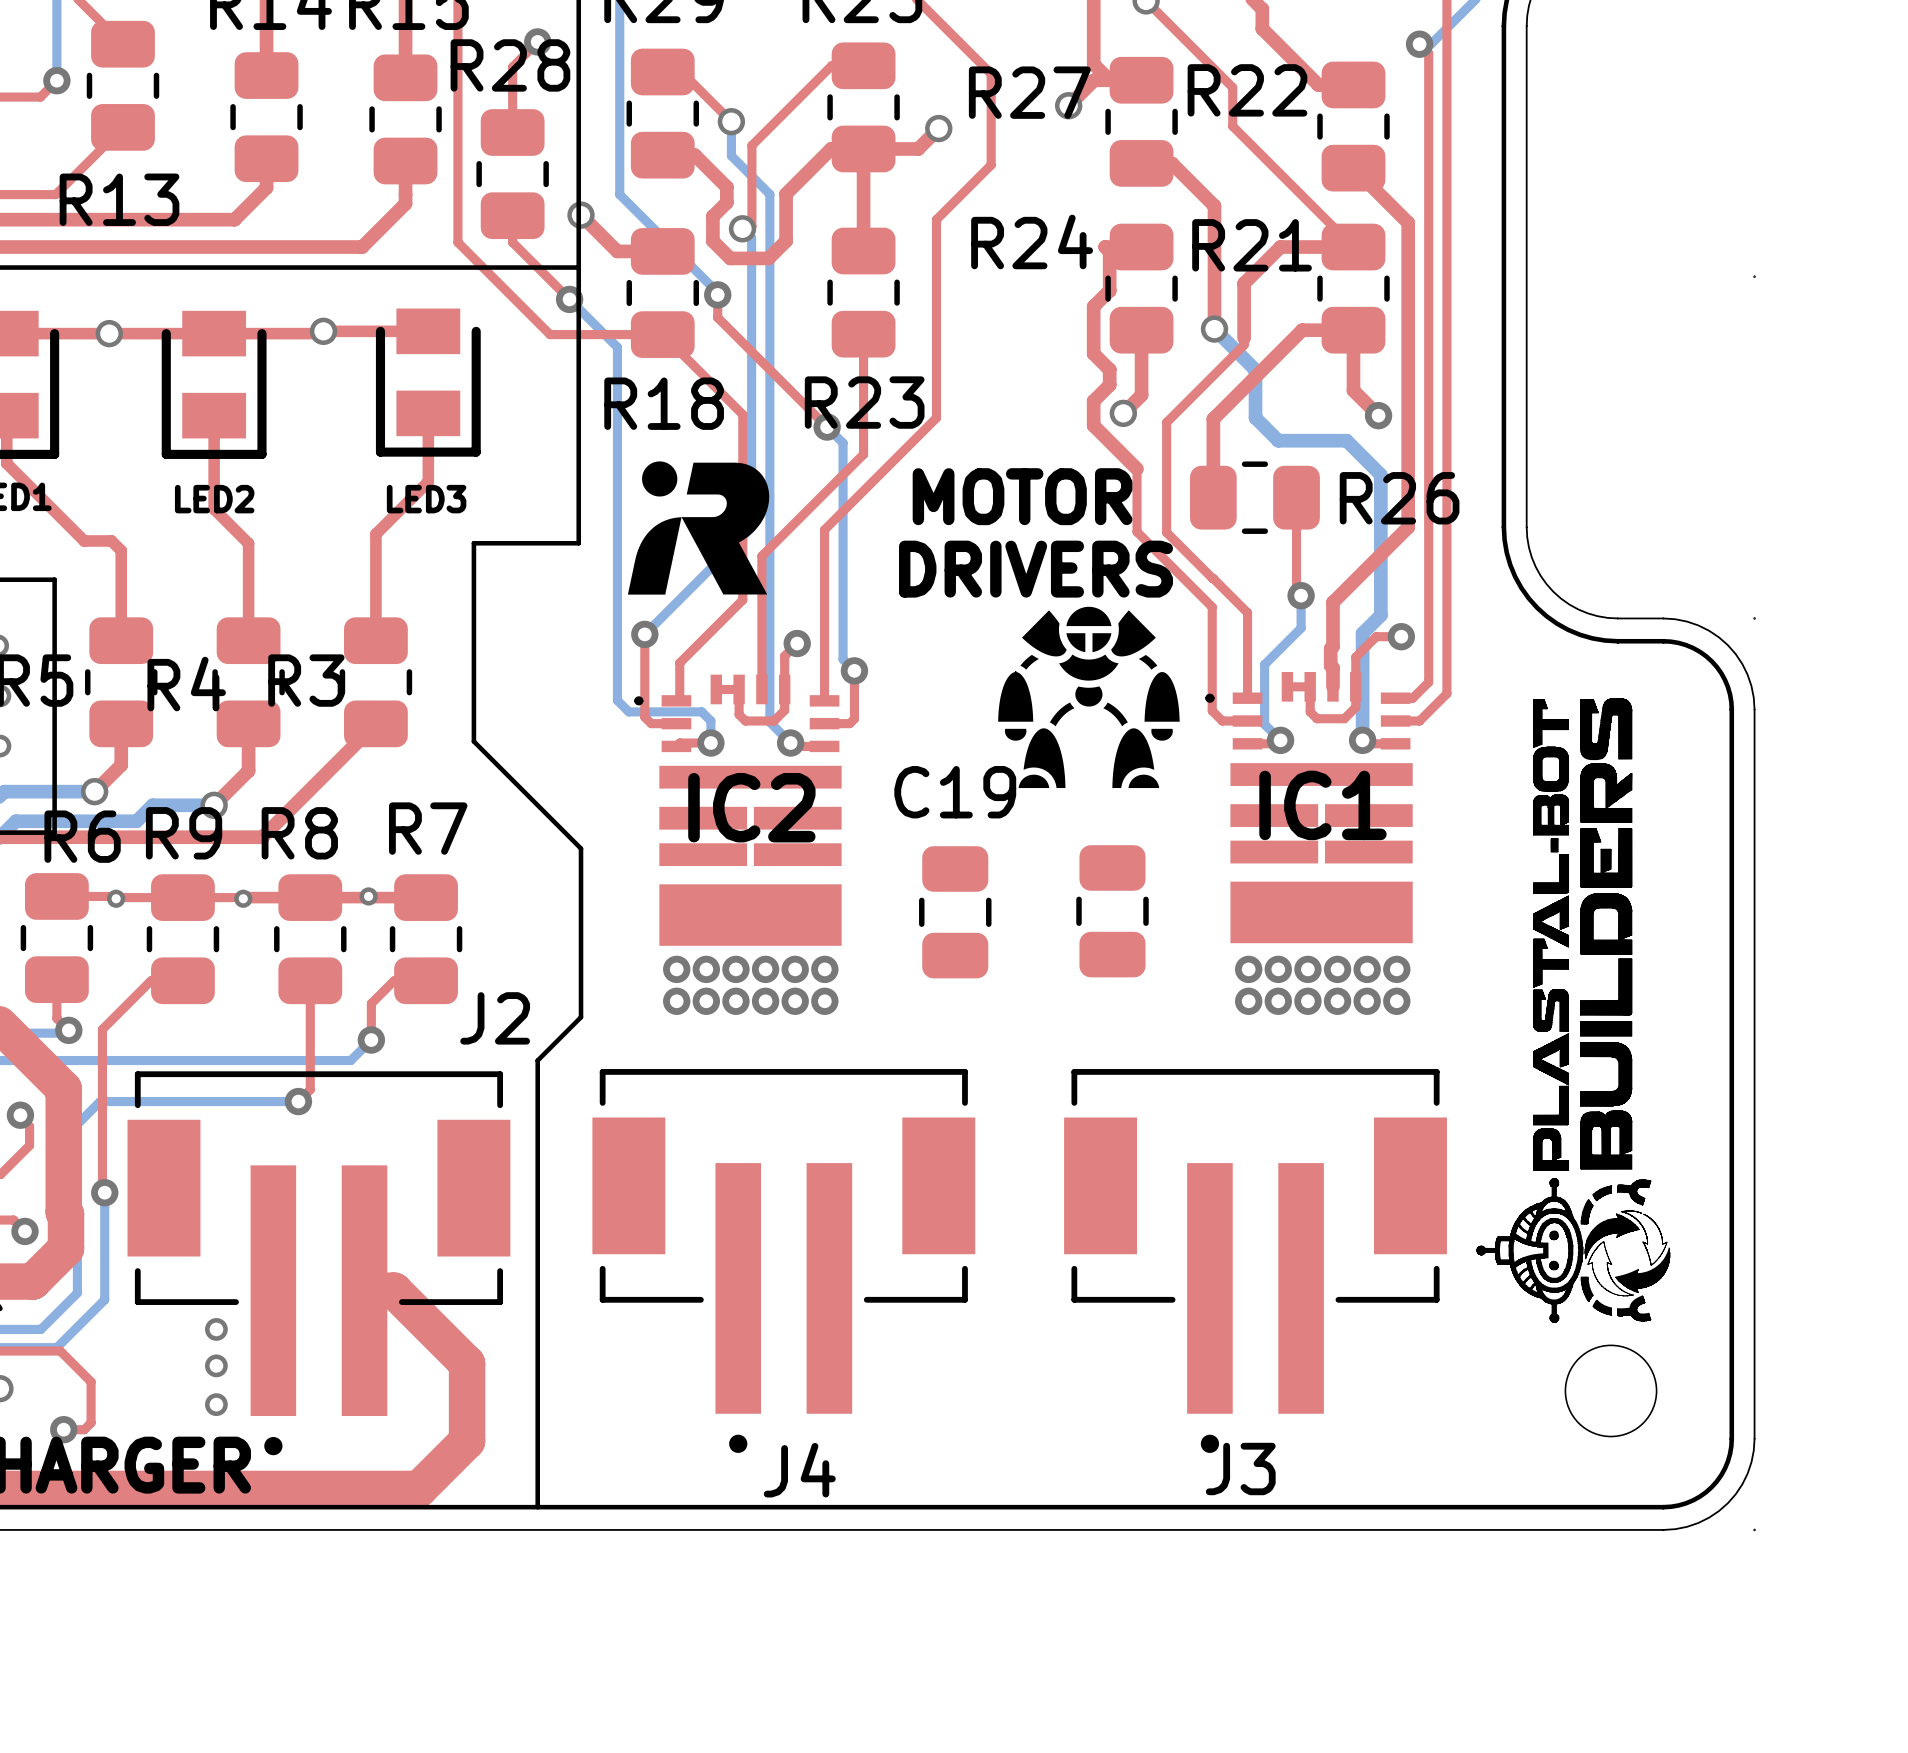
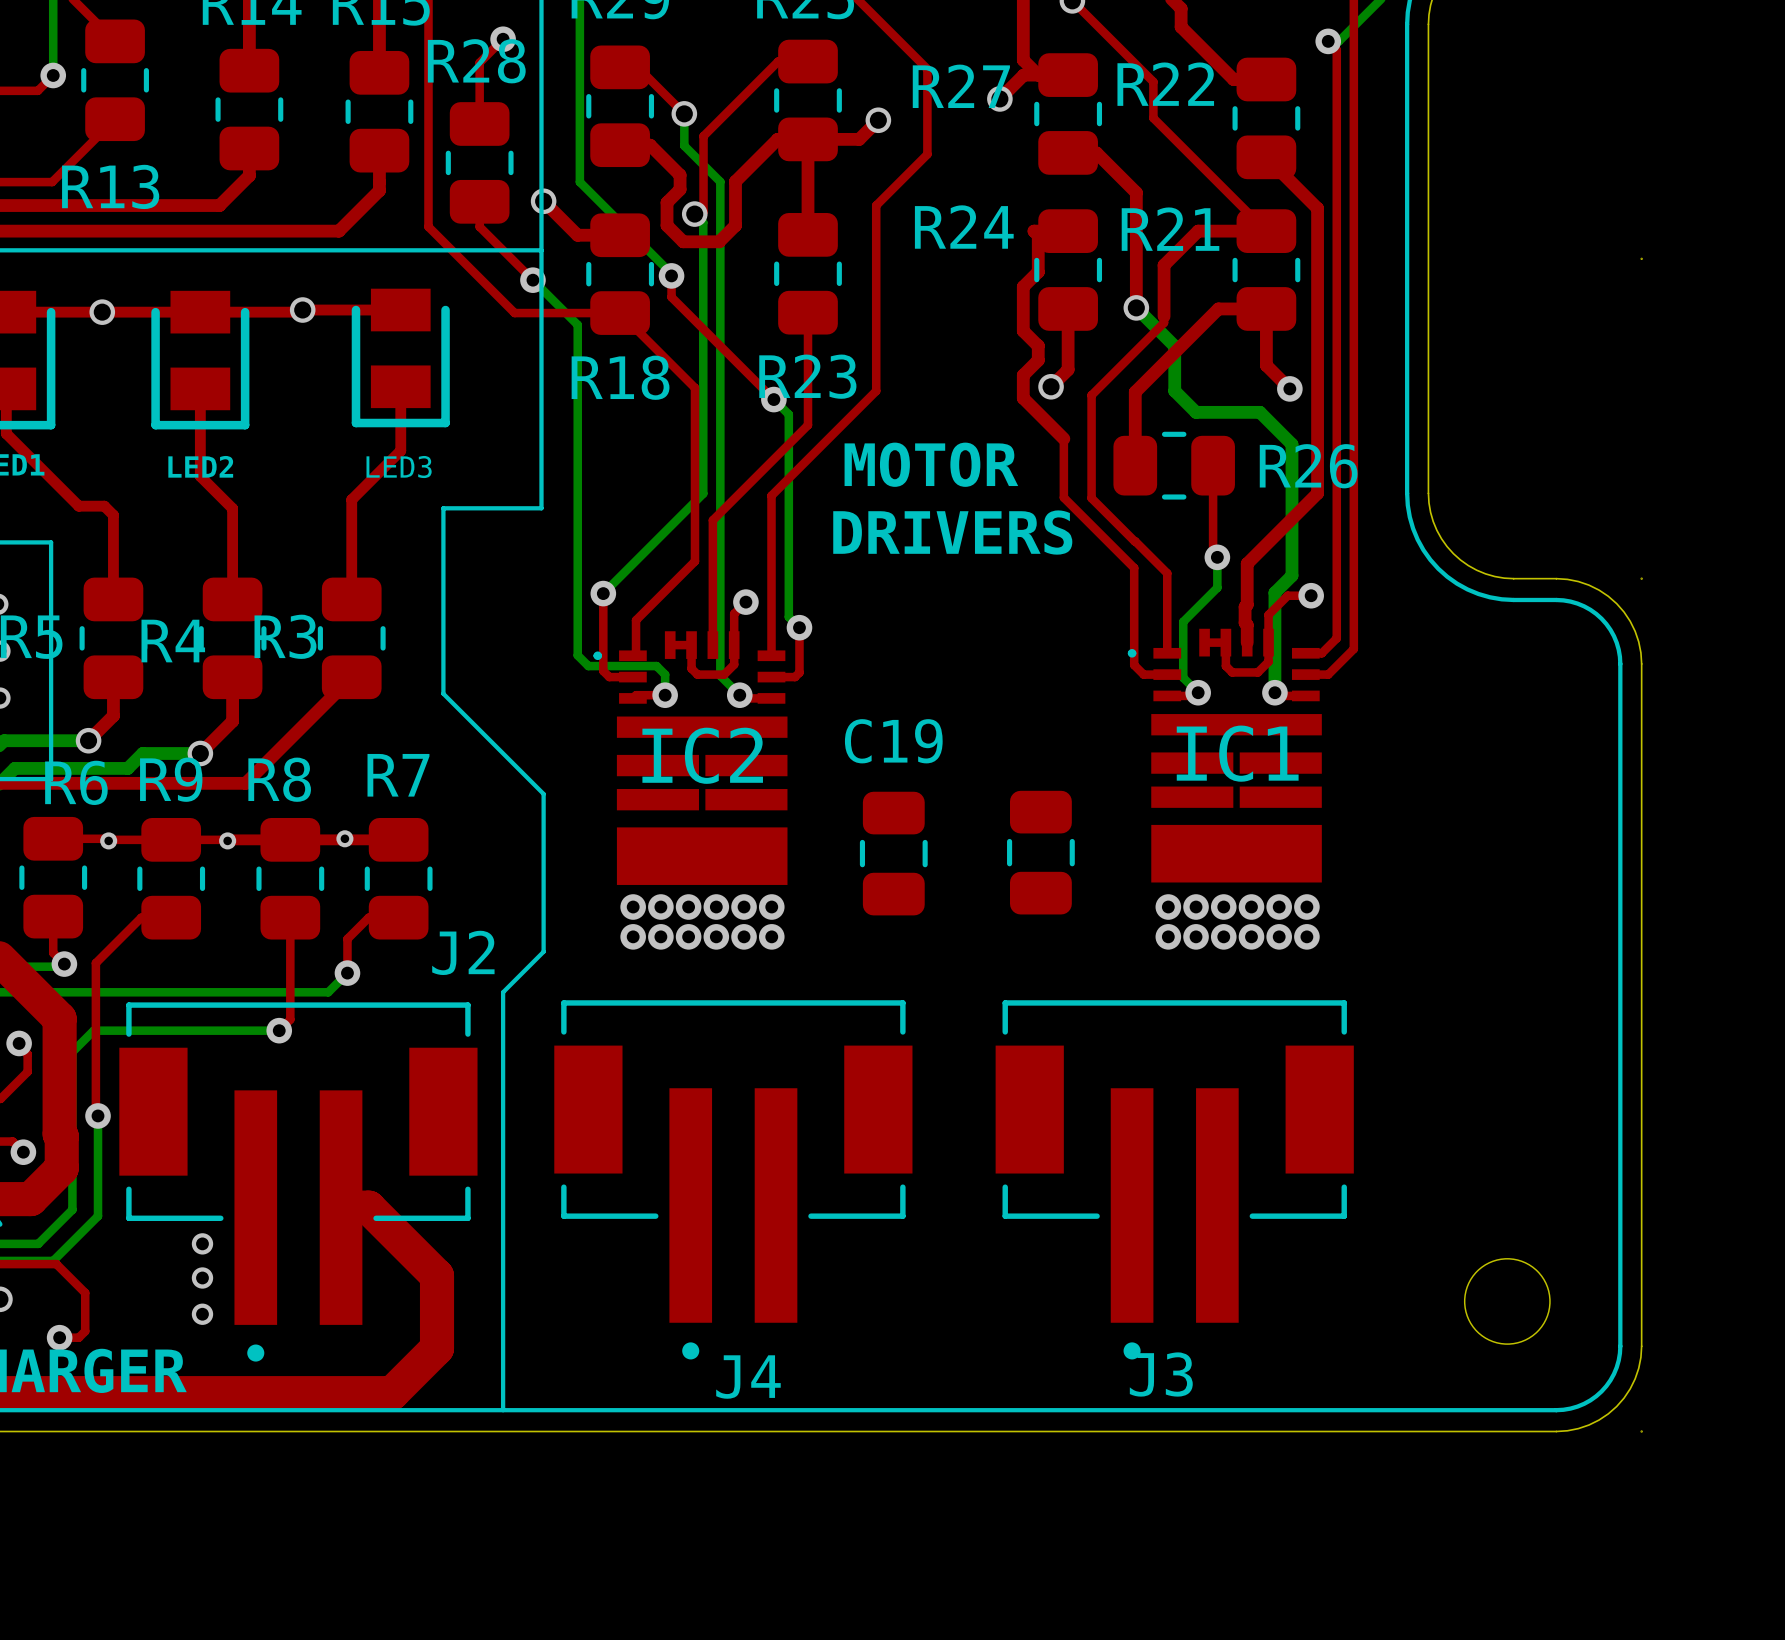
drawing: [627, 461, 770, 595] -> none
drawing: [998, 606, 1180, 789] -> none
drawing: [1476, 698, 1671, 1323] -> none

